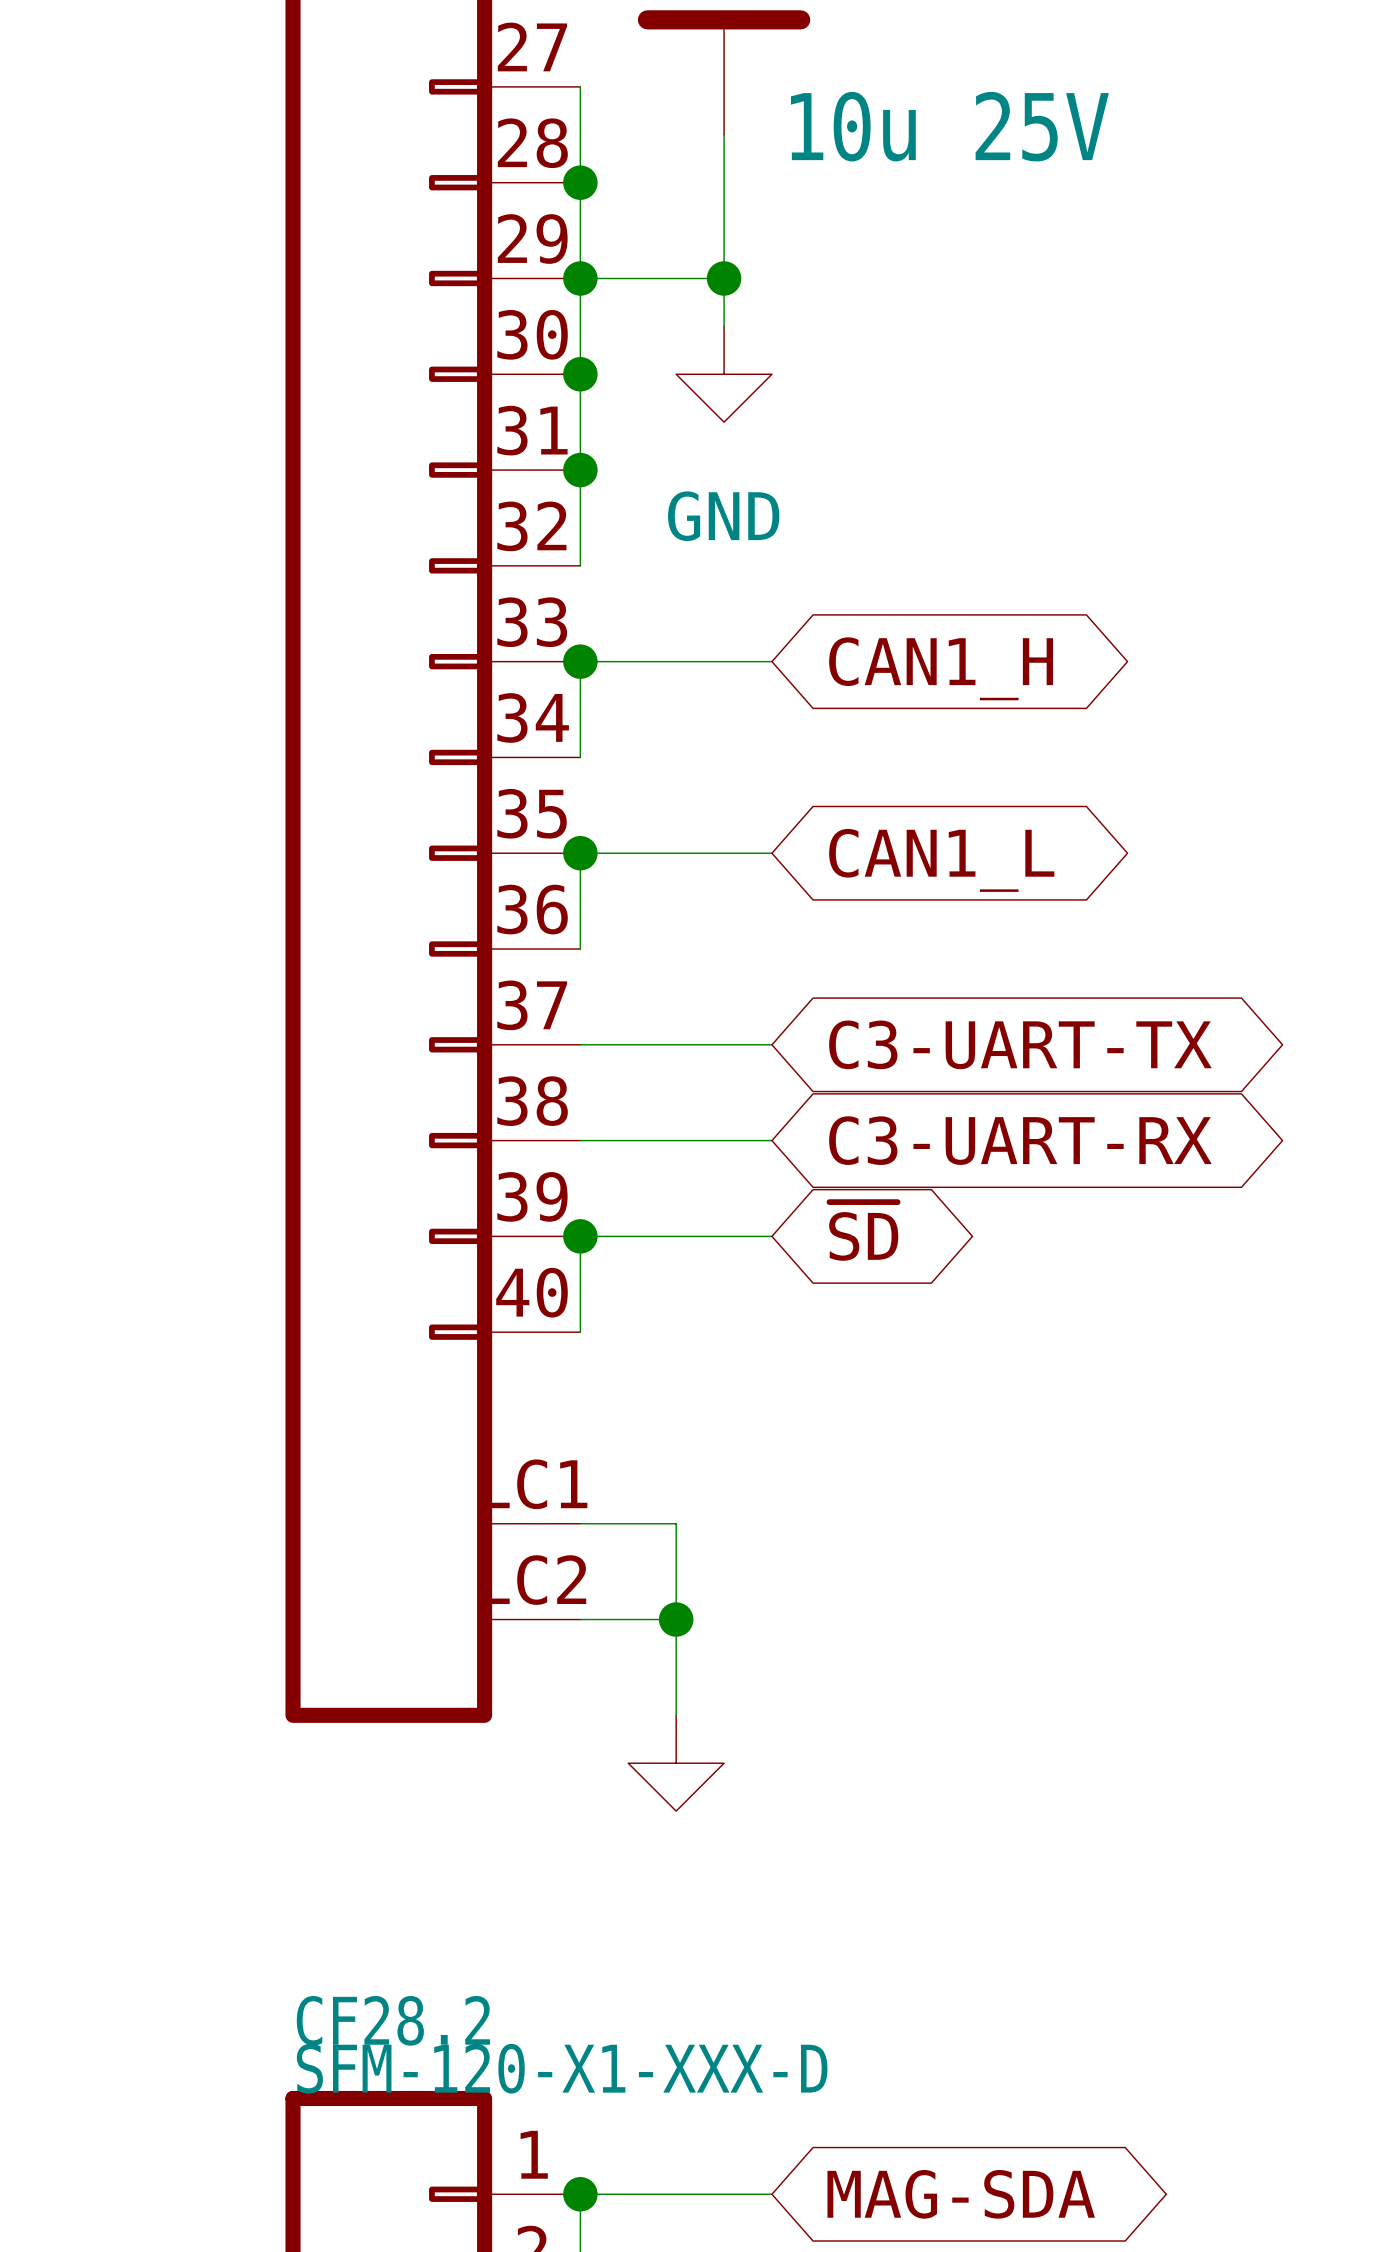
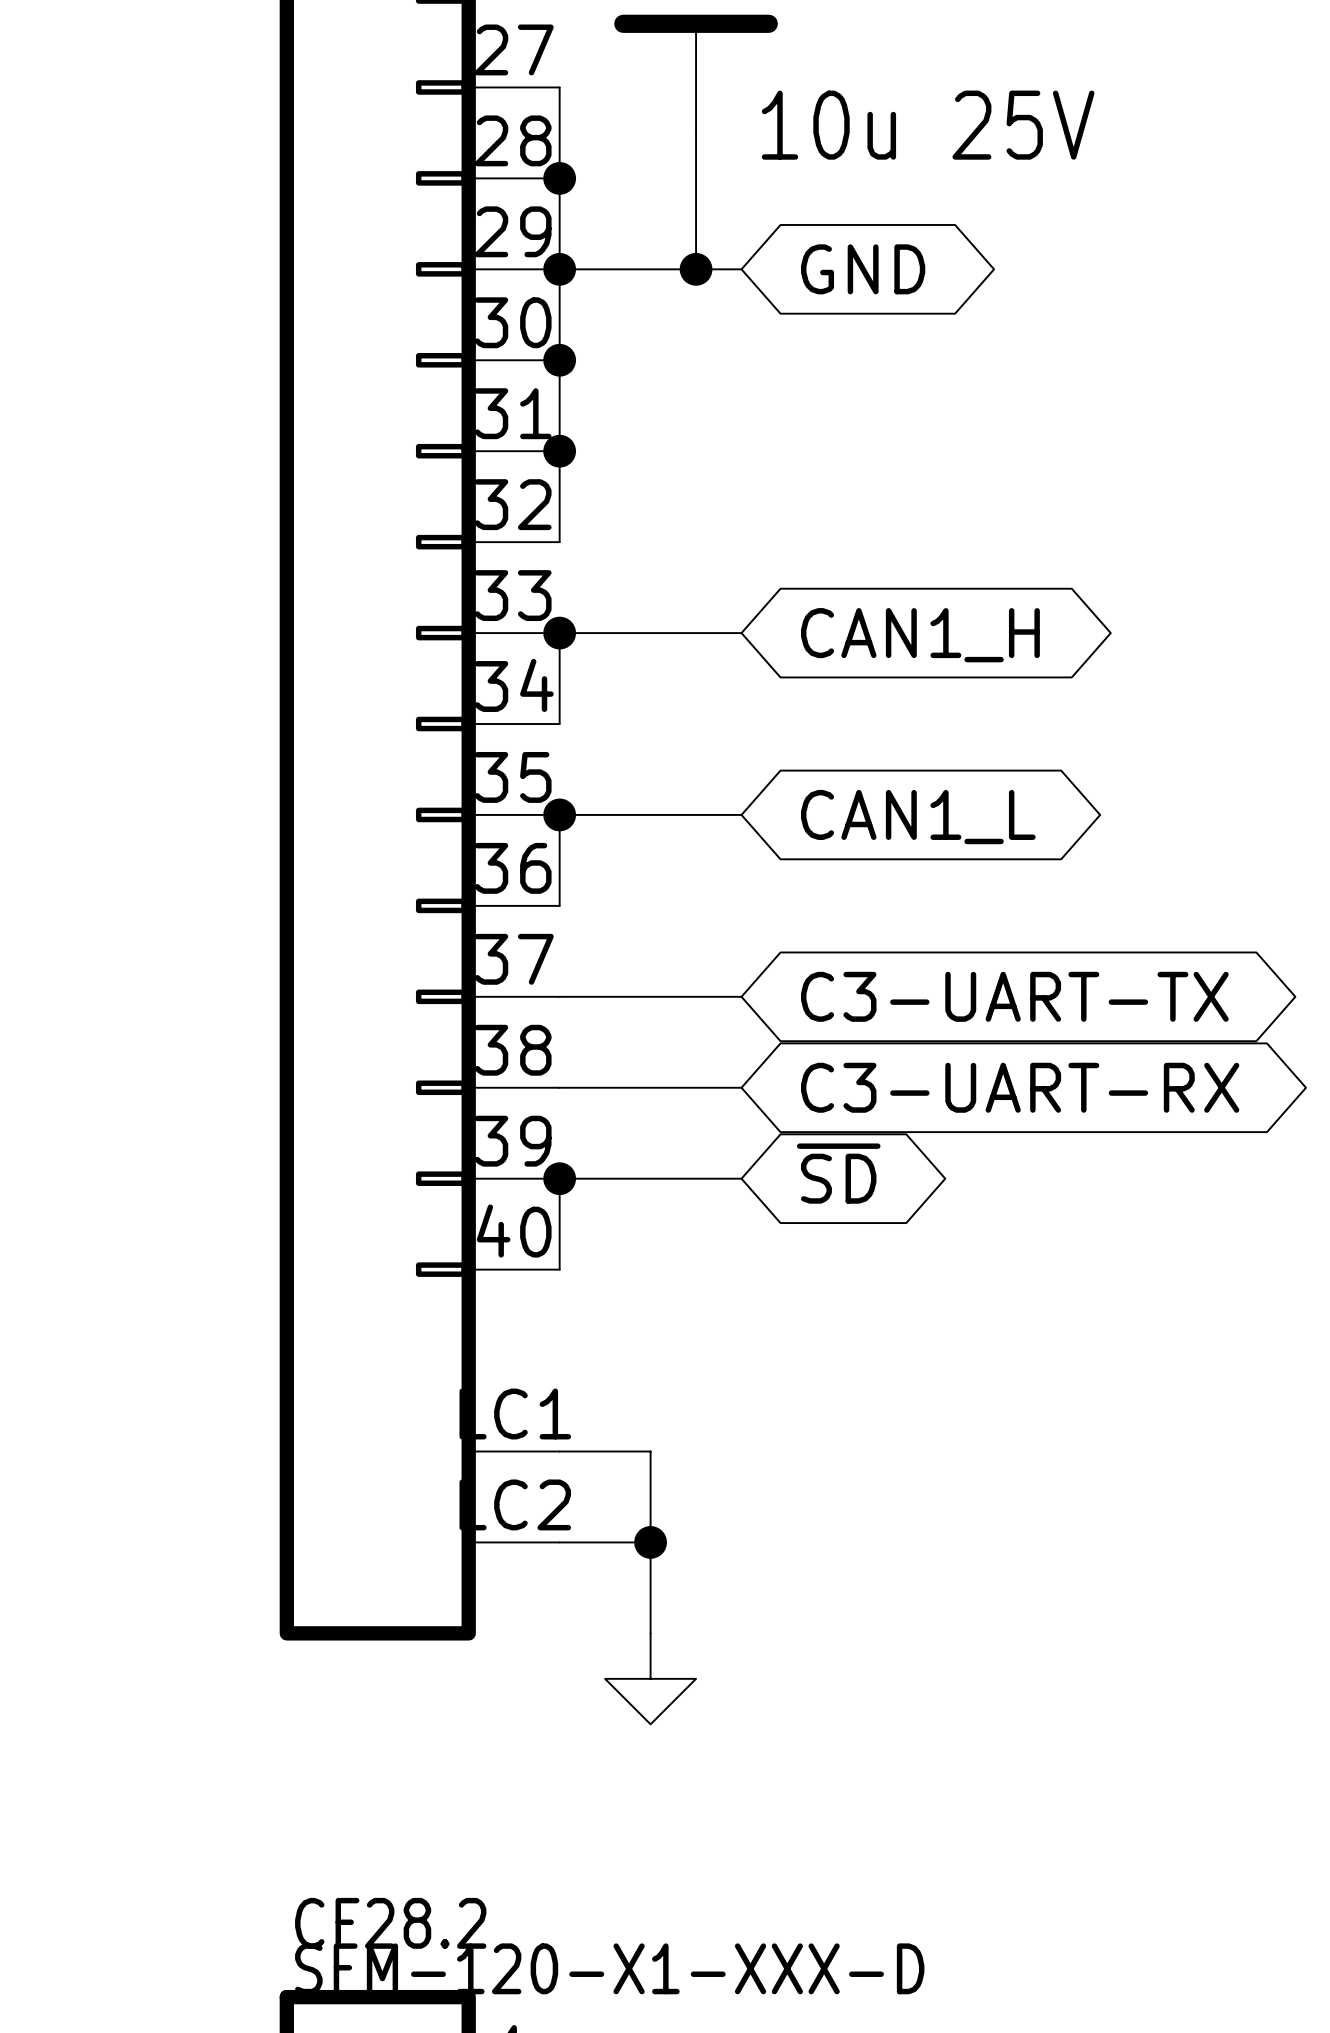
wire: (724, 278) (724, 326) -> (696, 269) (741, 269)
global label: none -> GND (863, 269)
power symbol: GND (724, 374) -> none

